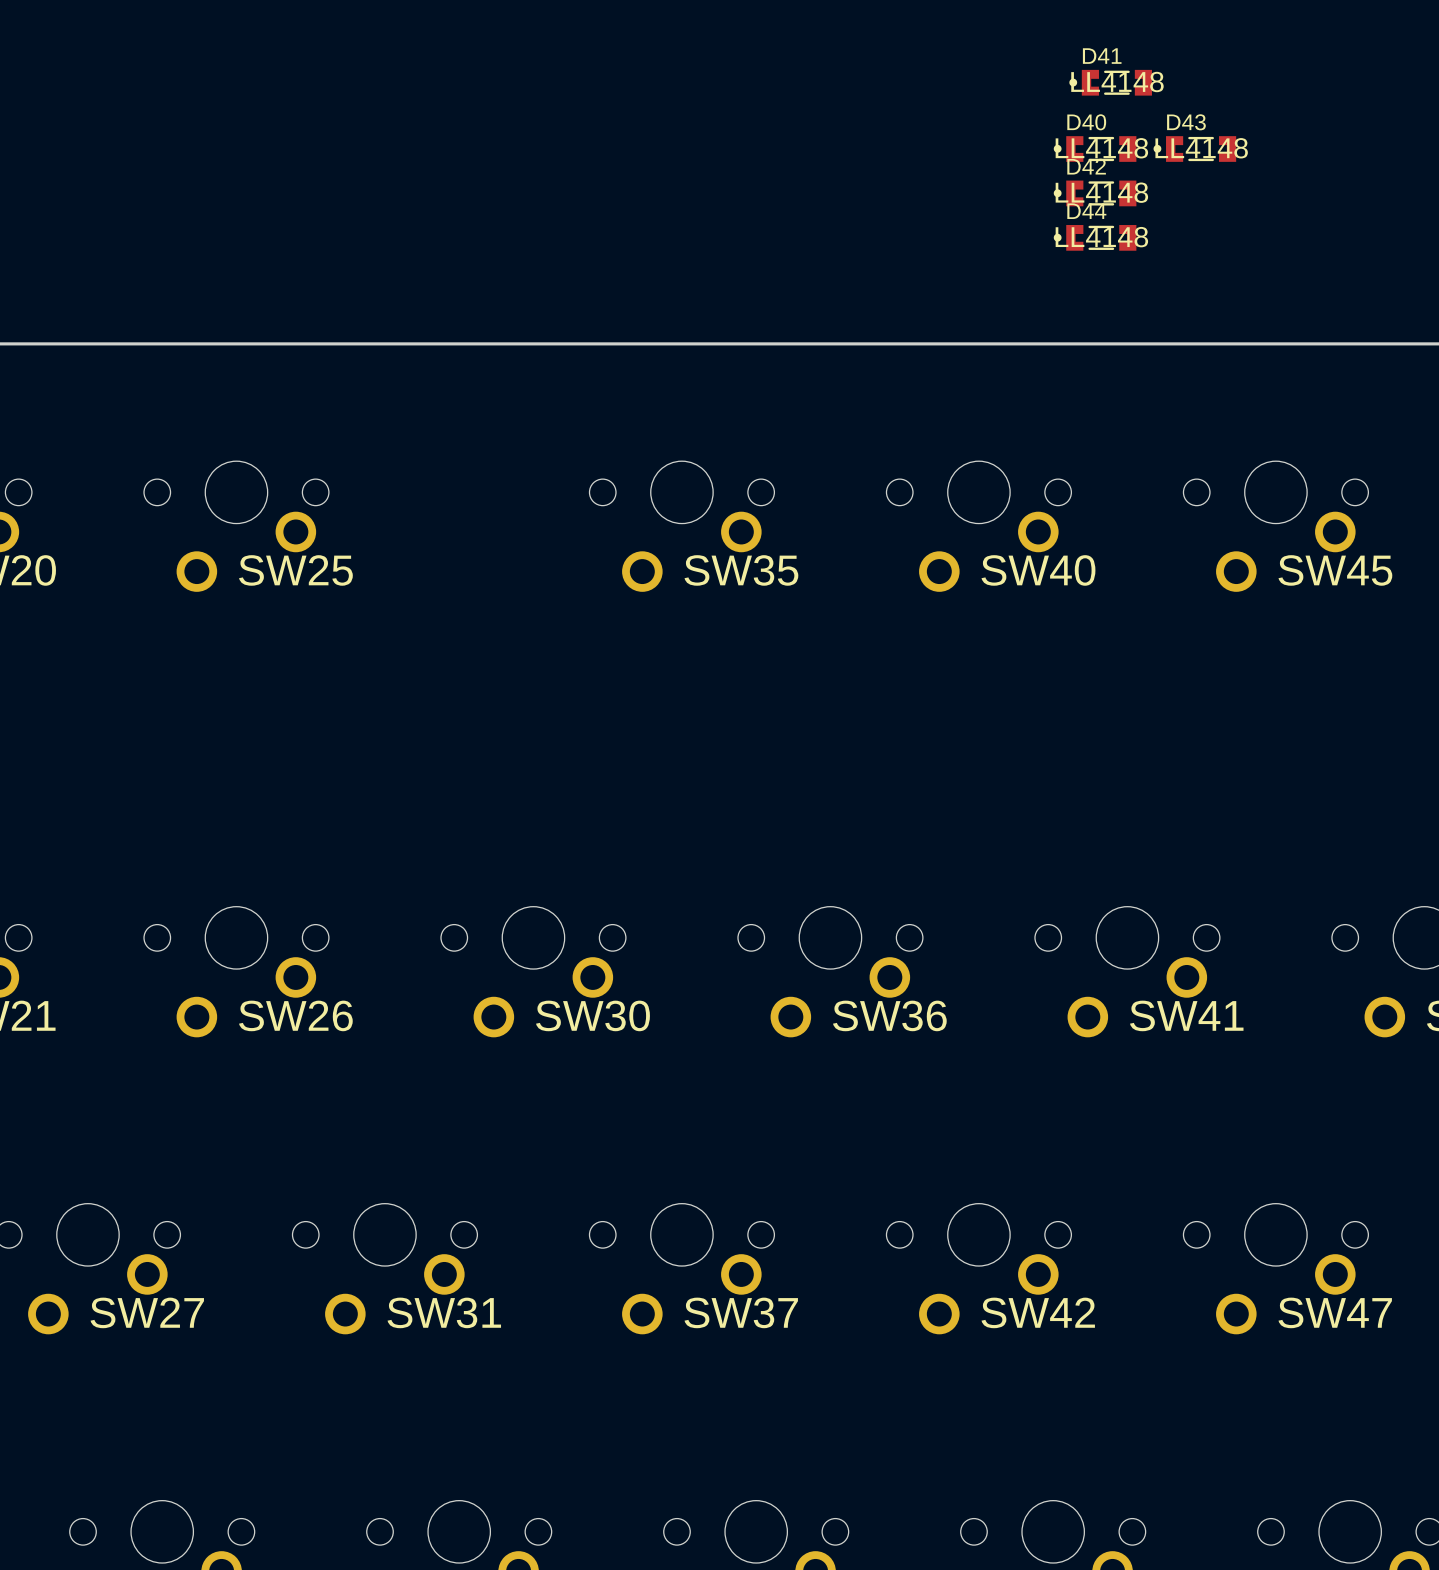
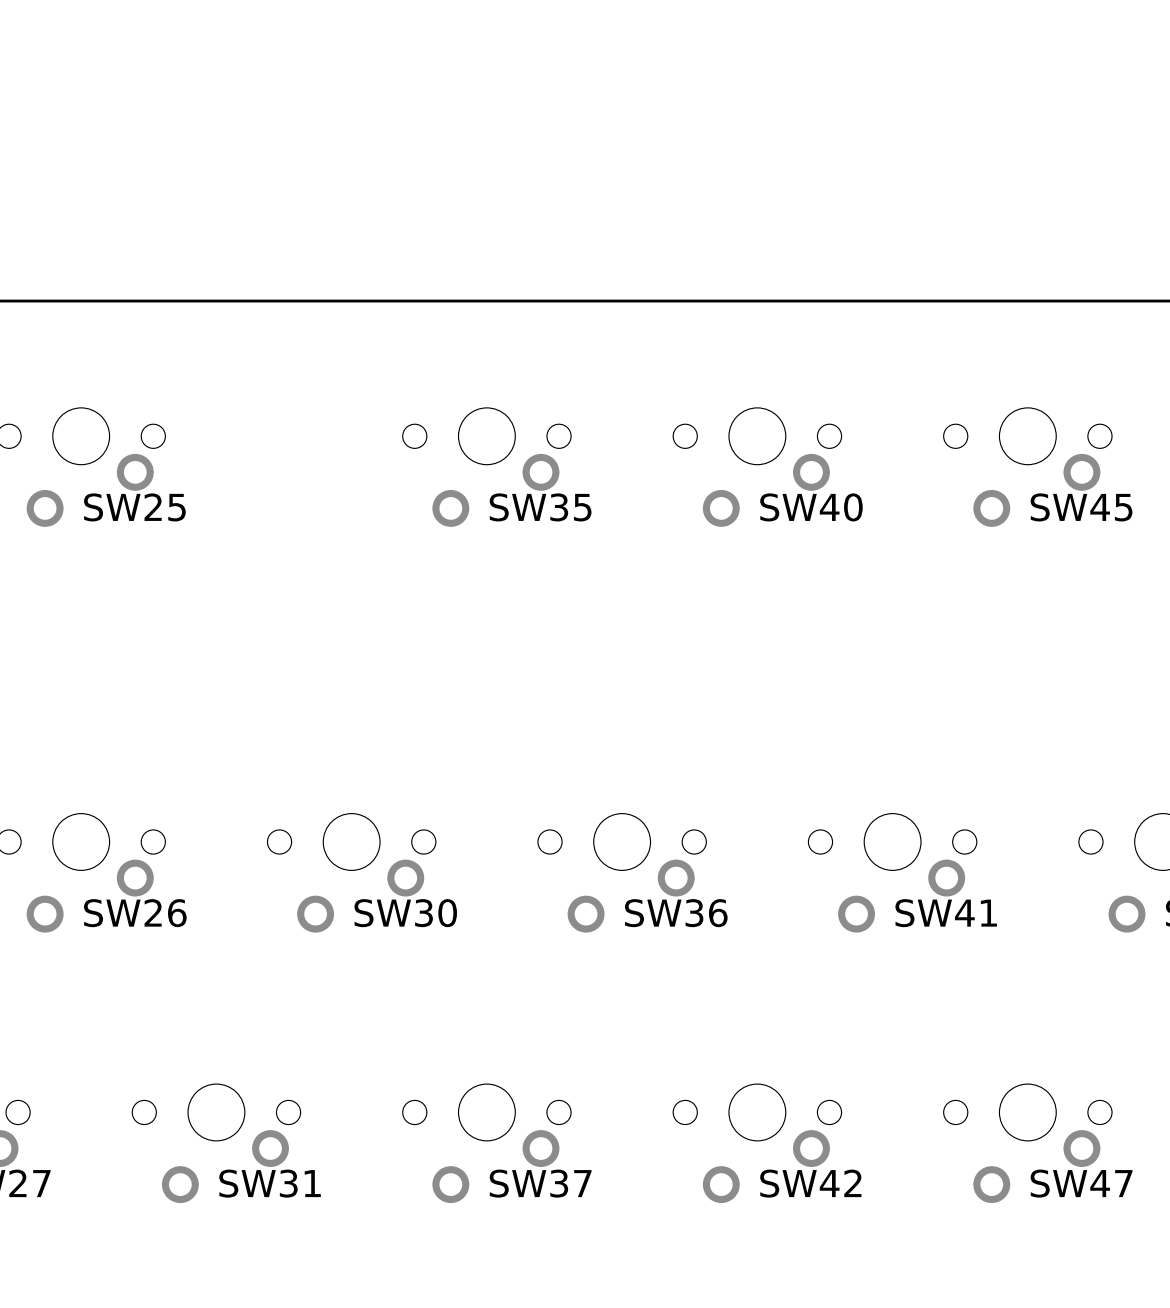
D41: LL4148 (1110, 82) -> none
D40: LL4148 (1095, 149) -> none
D43: LL4148 (1194, 149) -> none
D42: LL4148 (1095, 193) -> none
D44: LL4148 (1095, 237) -> none

